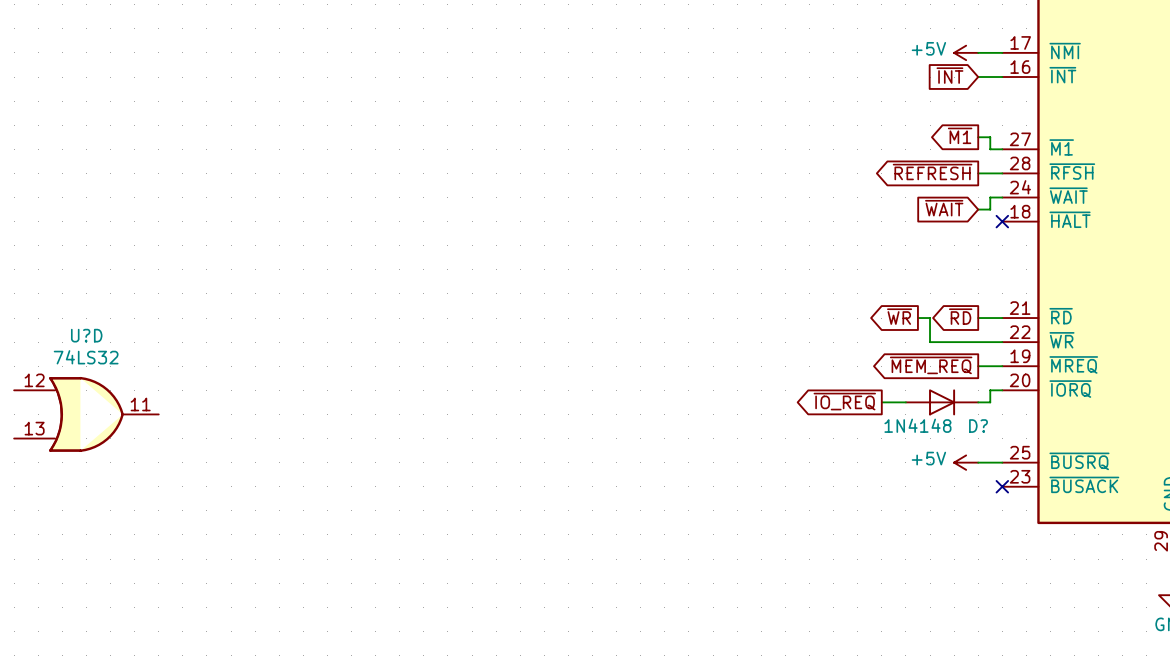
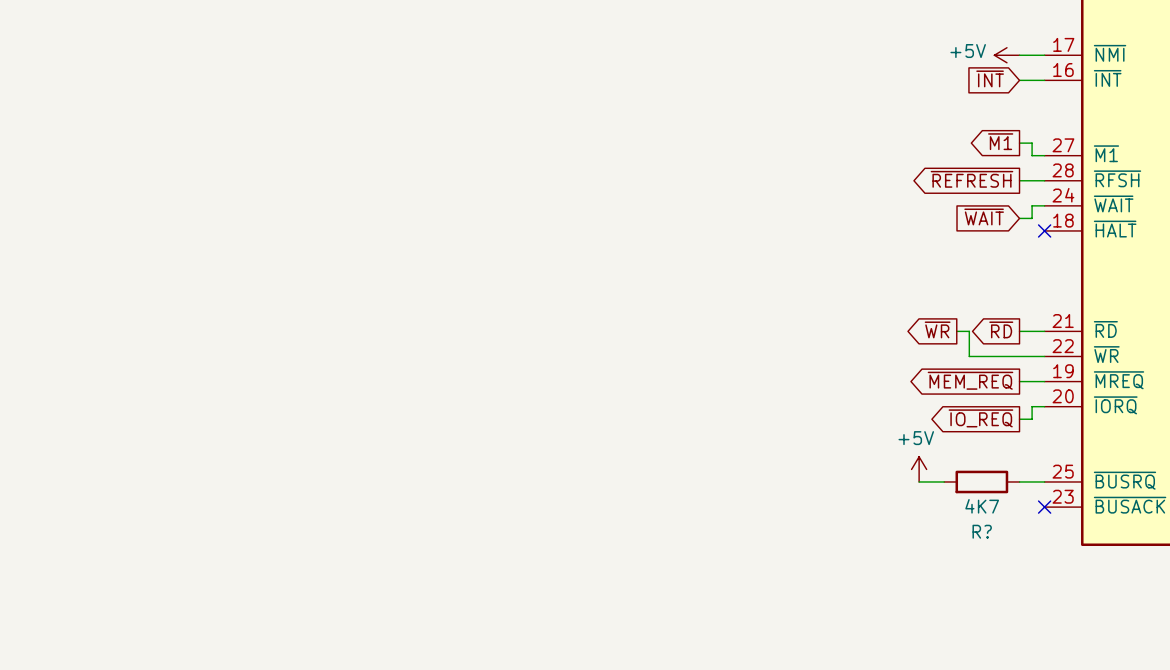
global label position: ~{IO_REQ} (844, 401) -> ~{IO_REQ} (980, 418)
wire: (881, 402) (905, 402) -> (919, 481) (944, 481)
D?: 1N4148 (942, 402) -> none
U?D: 74LS32 (86, 414) -> none
R?: none -> 4K7 (981, 481)
power symbol rotation: 0° (966, 462) -> 90° clockwise (919, 469)
power symbol position: +5V (966, 462) -> +5V (919, 469)

